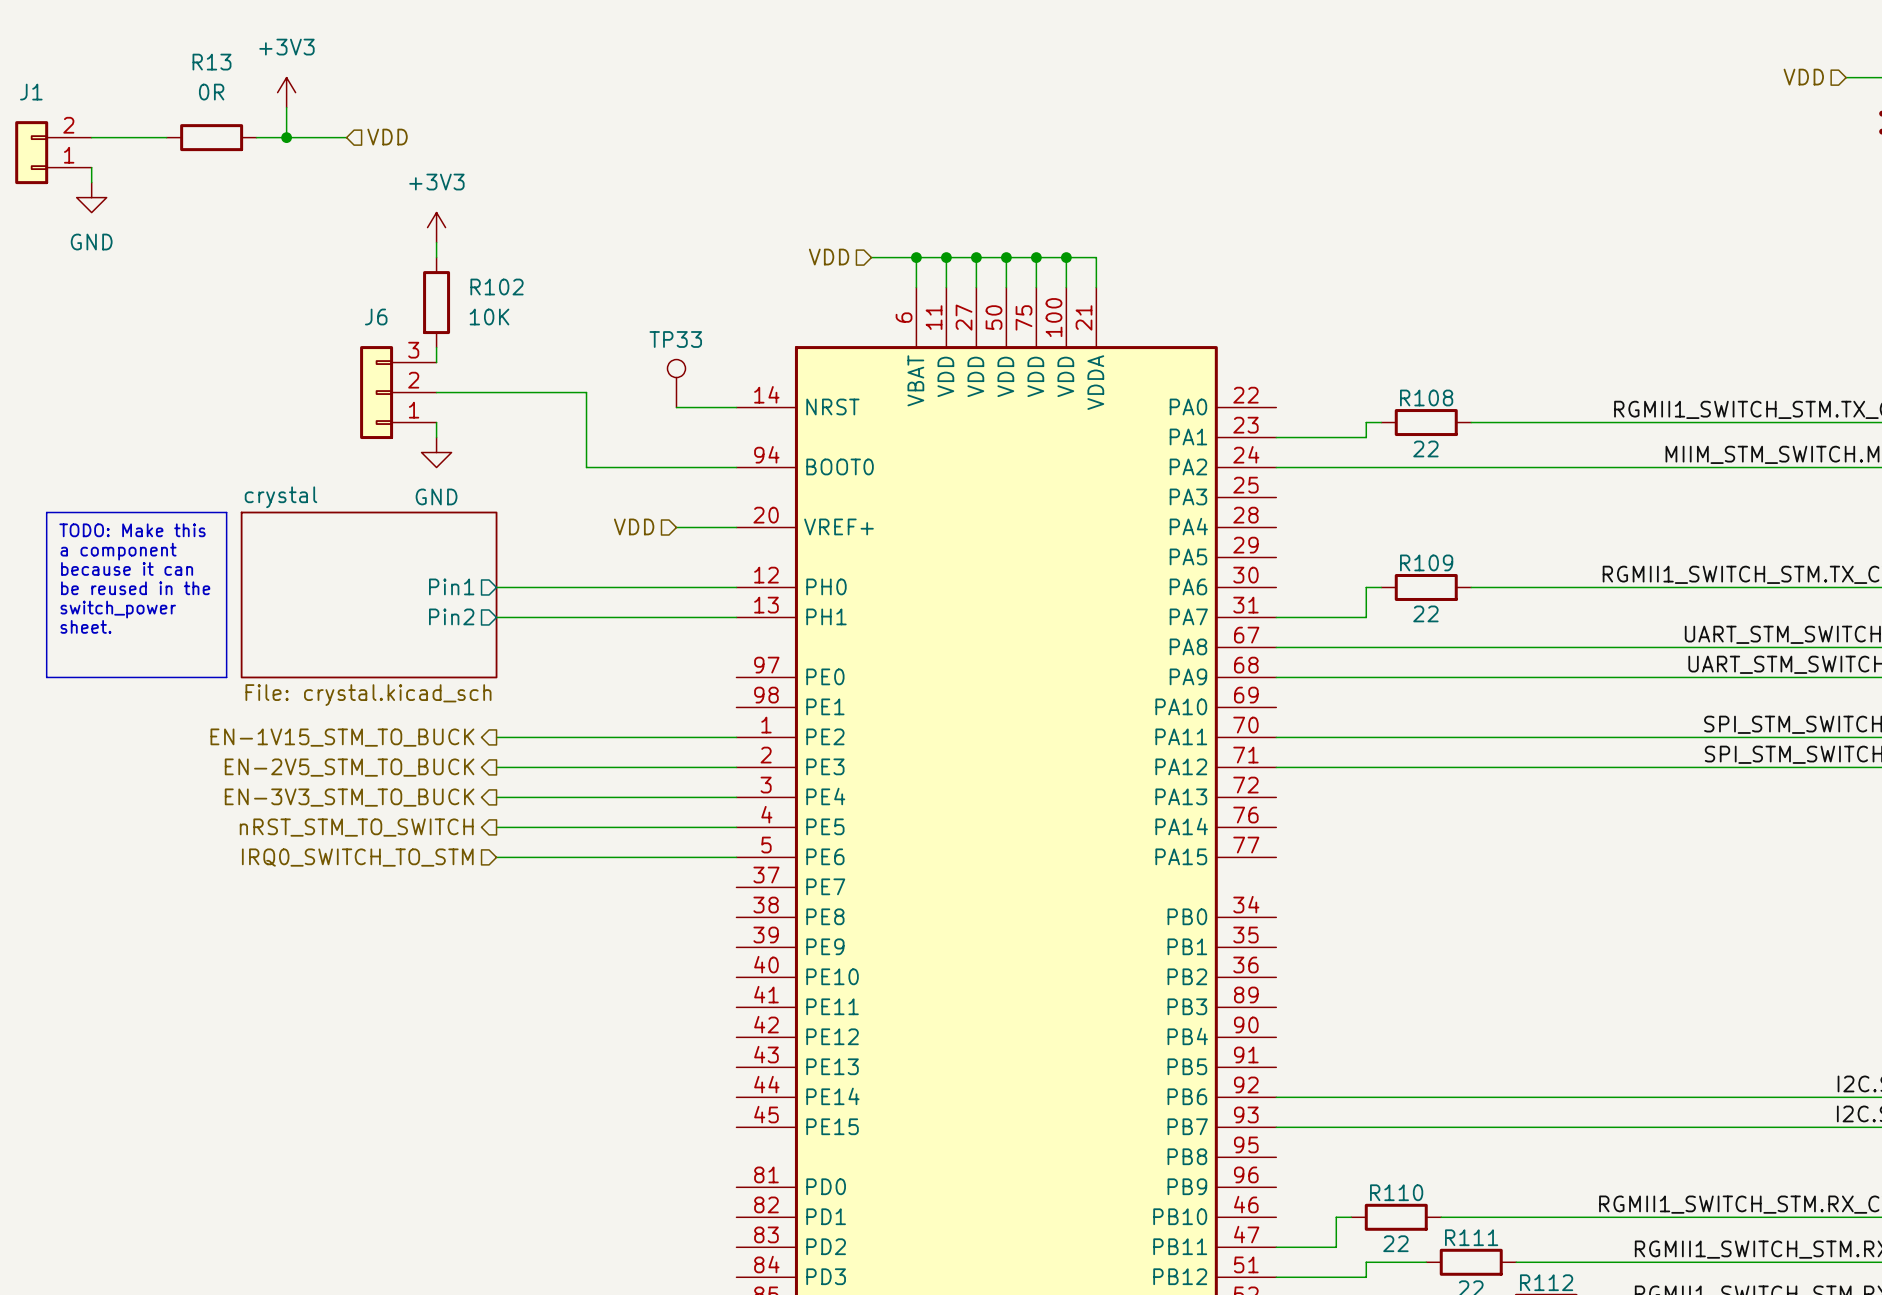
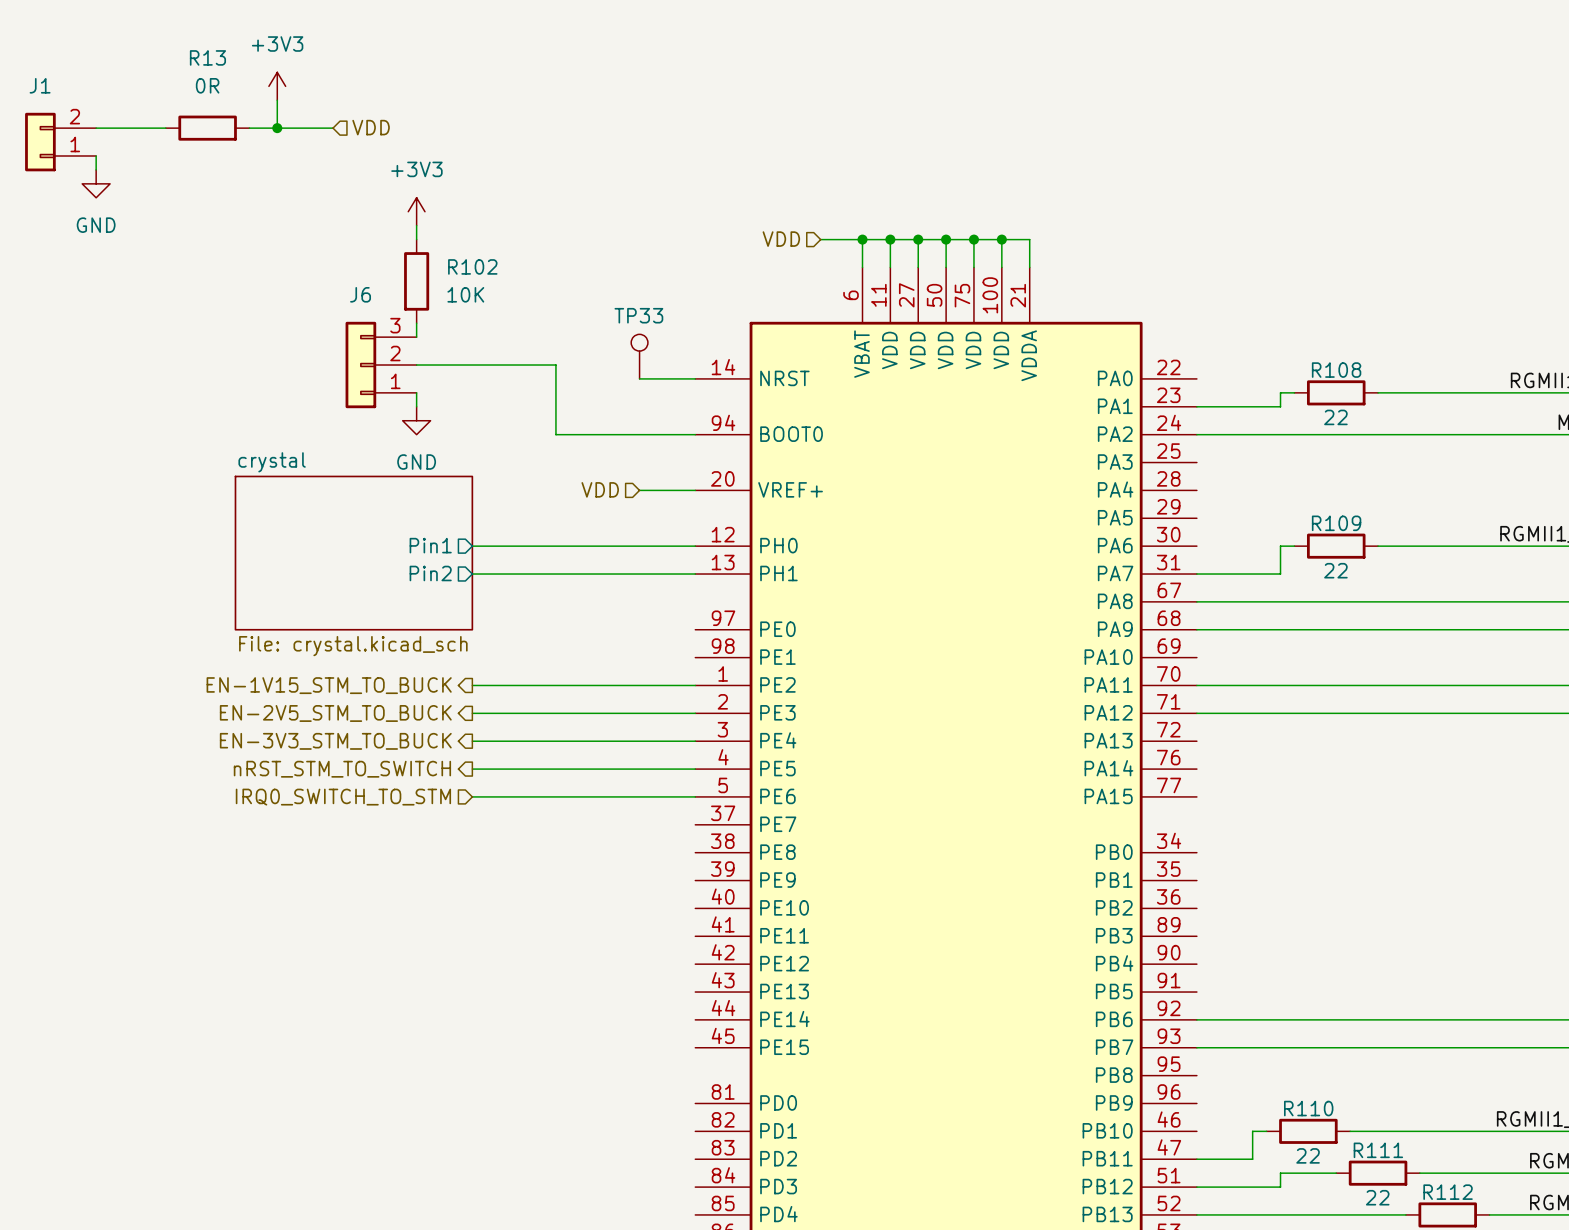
line: (46, 512) (226, 512) (226, 677) (46, 677) (46, 512) -> none
text: TODO: Make this (132, 530) -> none
text: a component (118, 551) -> none
text: because it can (127, 568) -> none
text: be reused in the (135, 588) -> none
text: switch_power (118, 609) -> none
text: sheet. (85, 626) -> none

